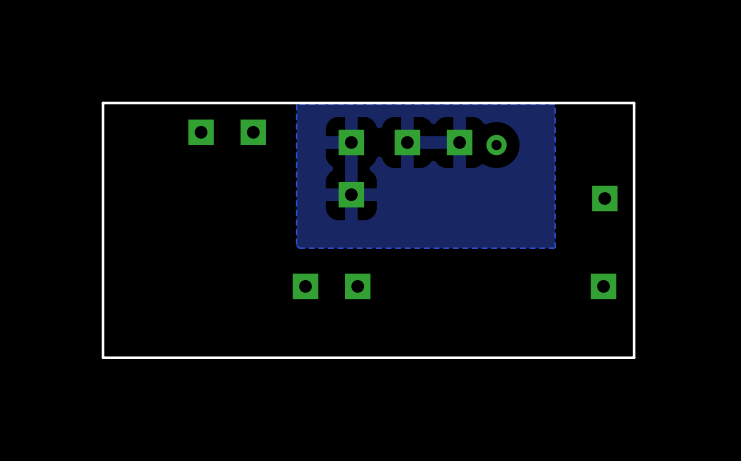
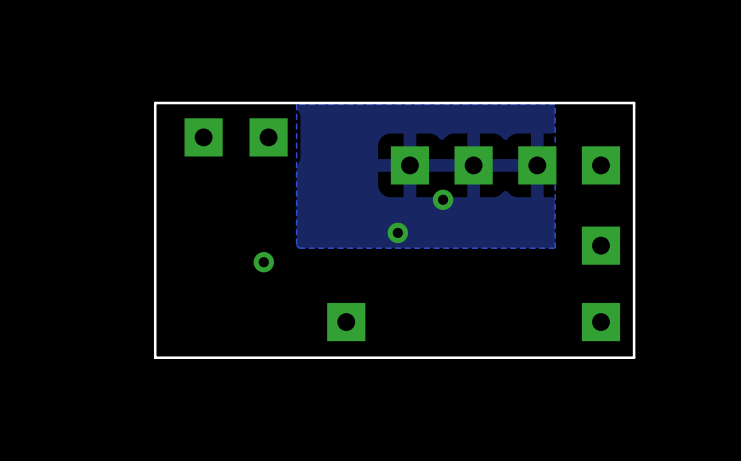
board edge: (155, 103) (103, 103) (103, 357) (155, 357) -> (155, 103) (155, 357)
part footprint: [188, 119, 214, 146] -> [184, 118, 223, 157]
part footprint: [240, 119, 267, 146] -> [249, 118, 288, 157]
part footprint: [394, 129, 421, 156] -> [390, 146, 430, 185]
part: (351, 142) -> none
part: (459, 142) -> none
via: (496, 145) -> none
part: none -> (473, 165)
part: none -> (537, 165)
part: none -> (600, 165)
part: (351, 194) -> none
part: (604, 198) -> none
via: none -> (443, 199)
via: none -> (397, 232)
part: none -> (600, 245)
via: none -> (263, 262)
part: (305, 286) -> none
part: (357, 286) -> none
part: (603, 286) -> none
part: none -> (346, 322)
part: none -> (600, 322)

